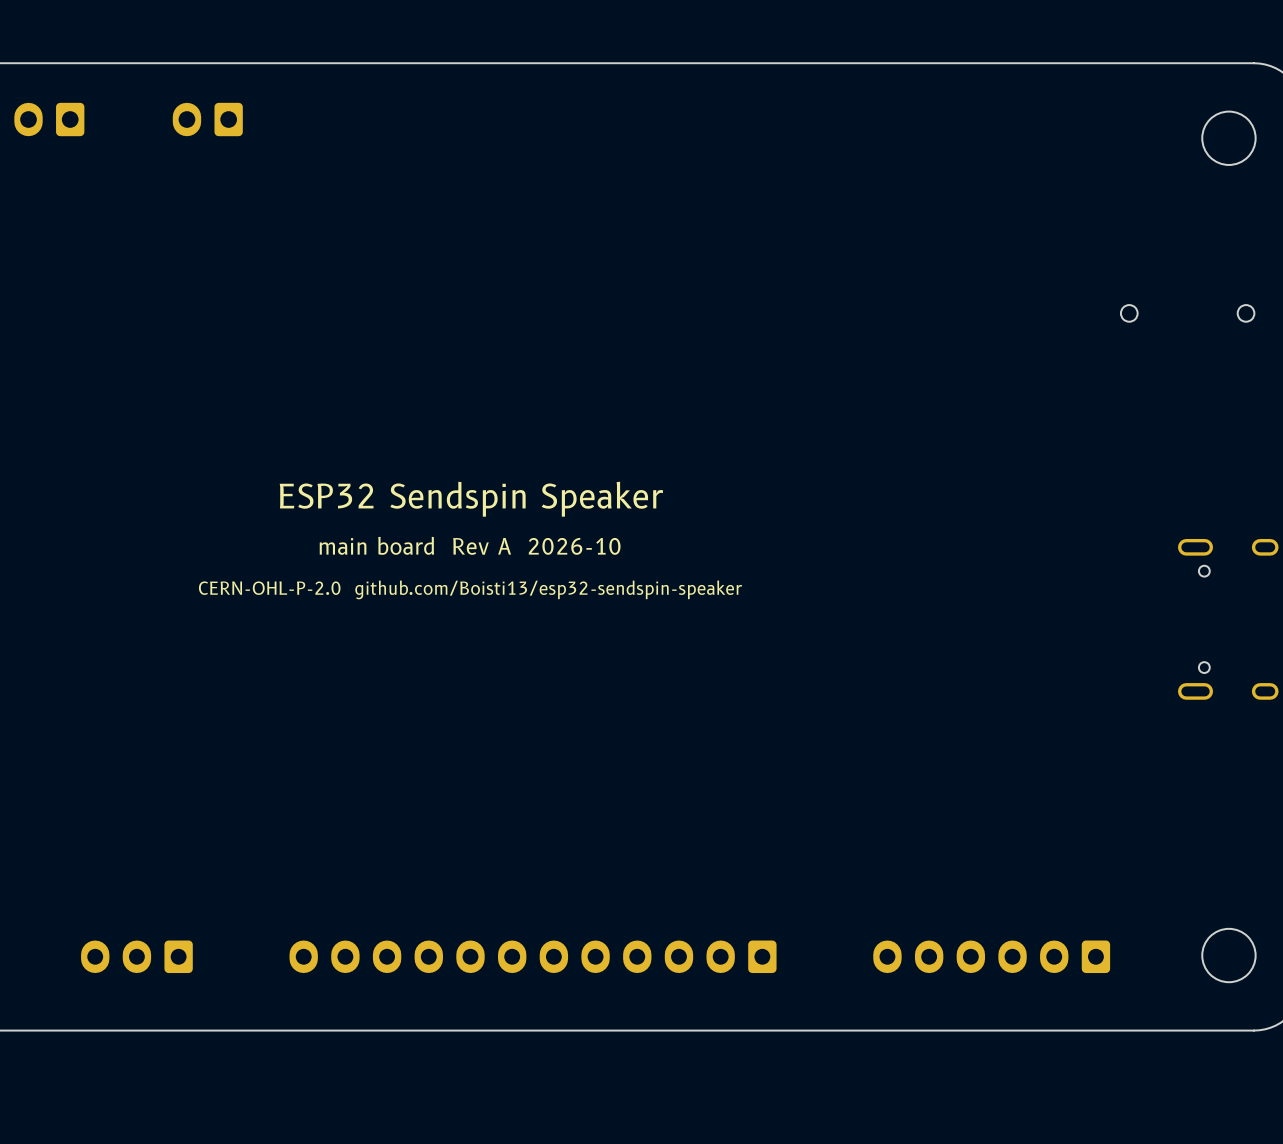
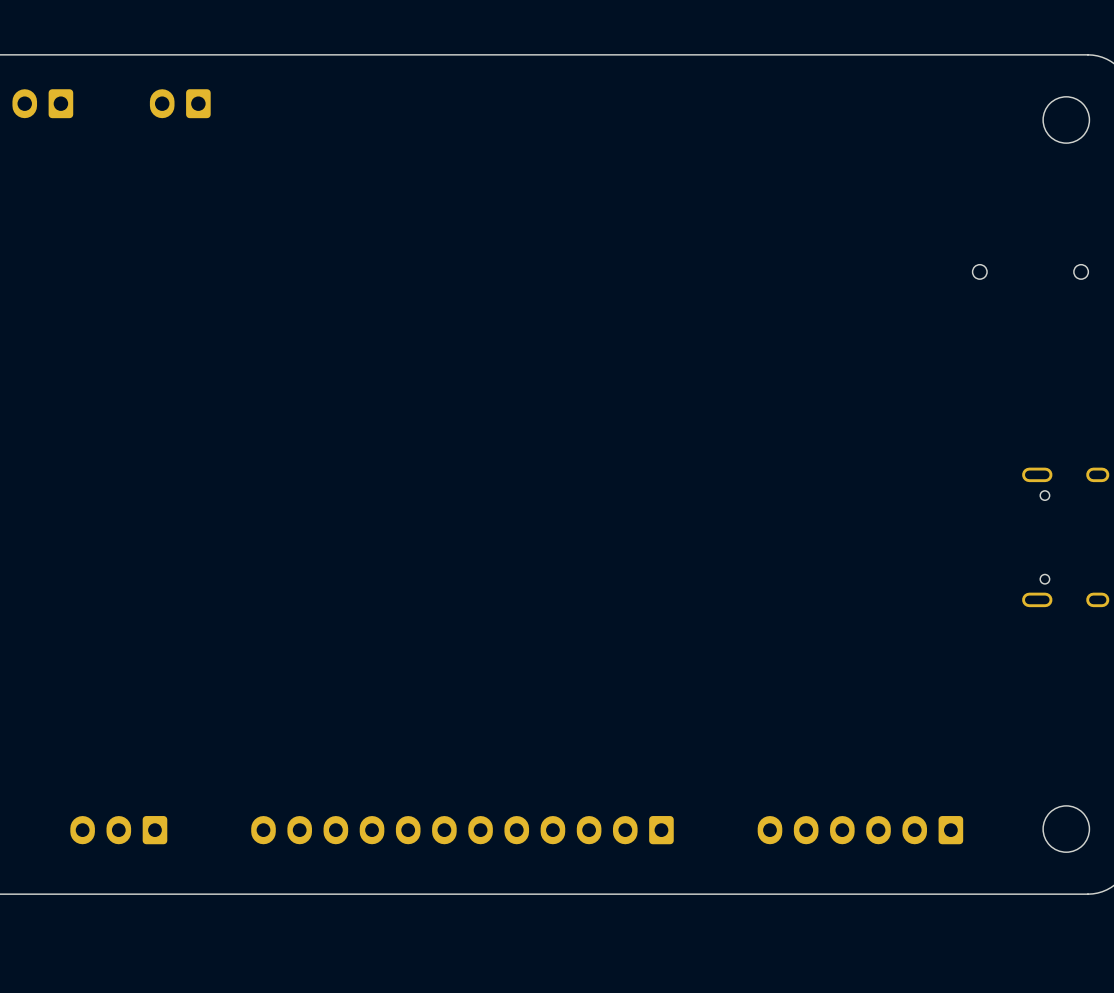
text: ESP32 Sendspin Speaker (471, 499) -> none
text: main board Rev A 2026-10 (470, 545) -> none
text: CERN-OHL-P-2.0 github.com/Boisti13/esp32-sendspin-speaker (470, 589) -> none

